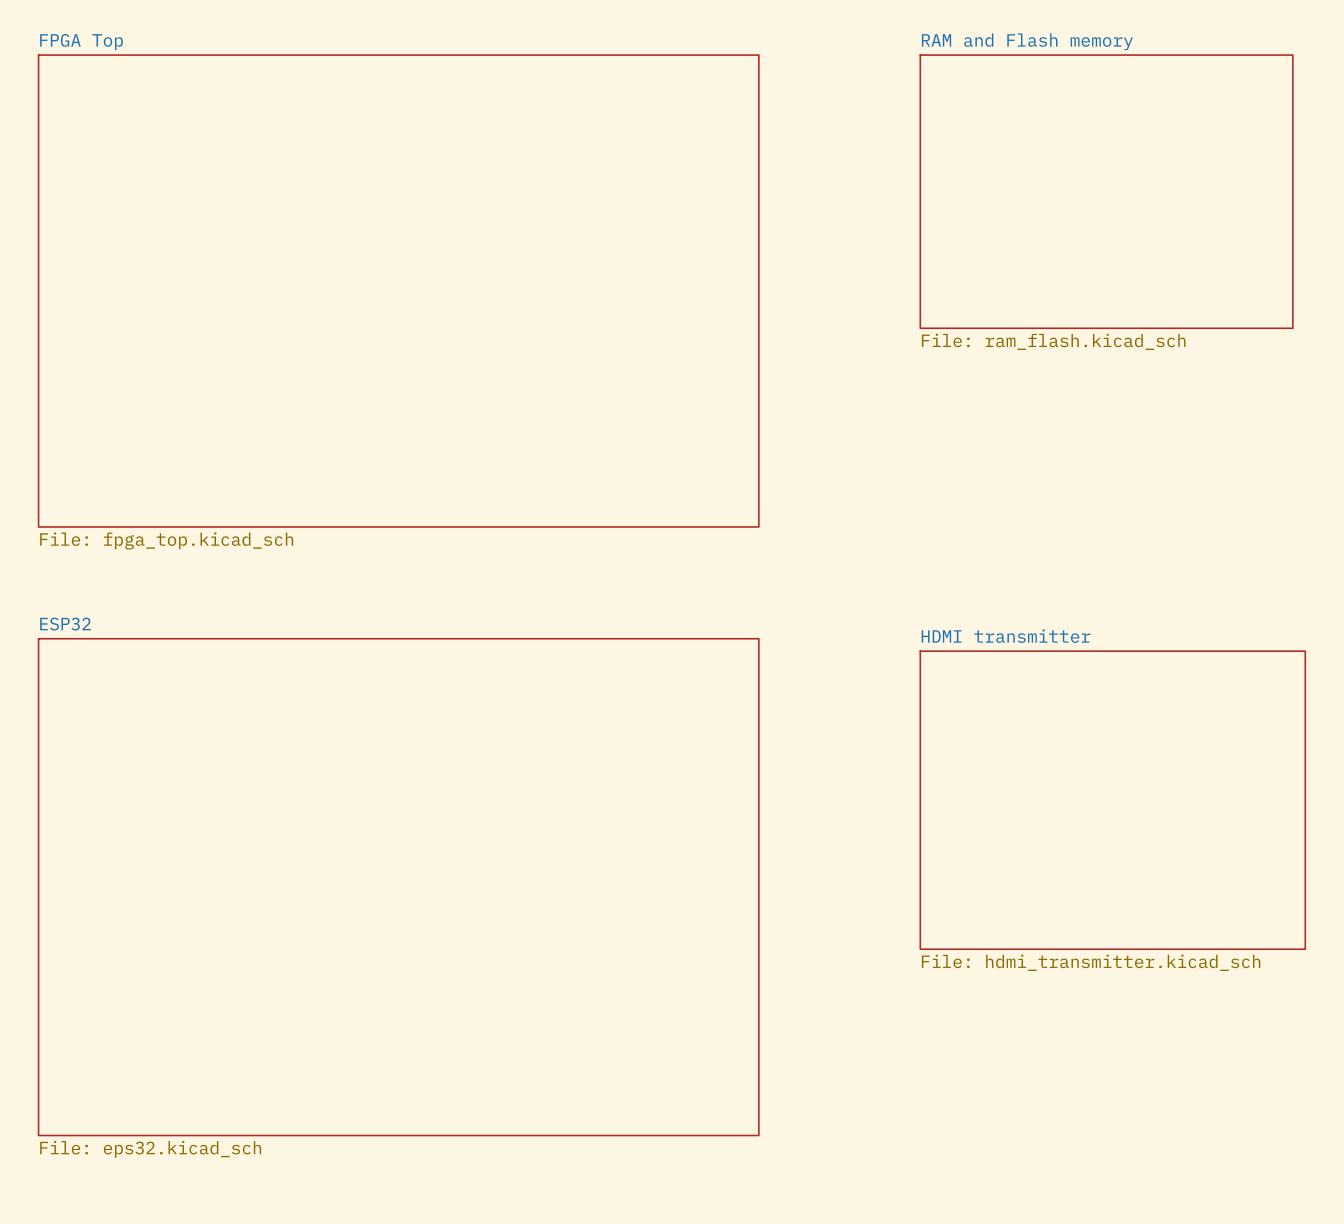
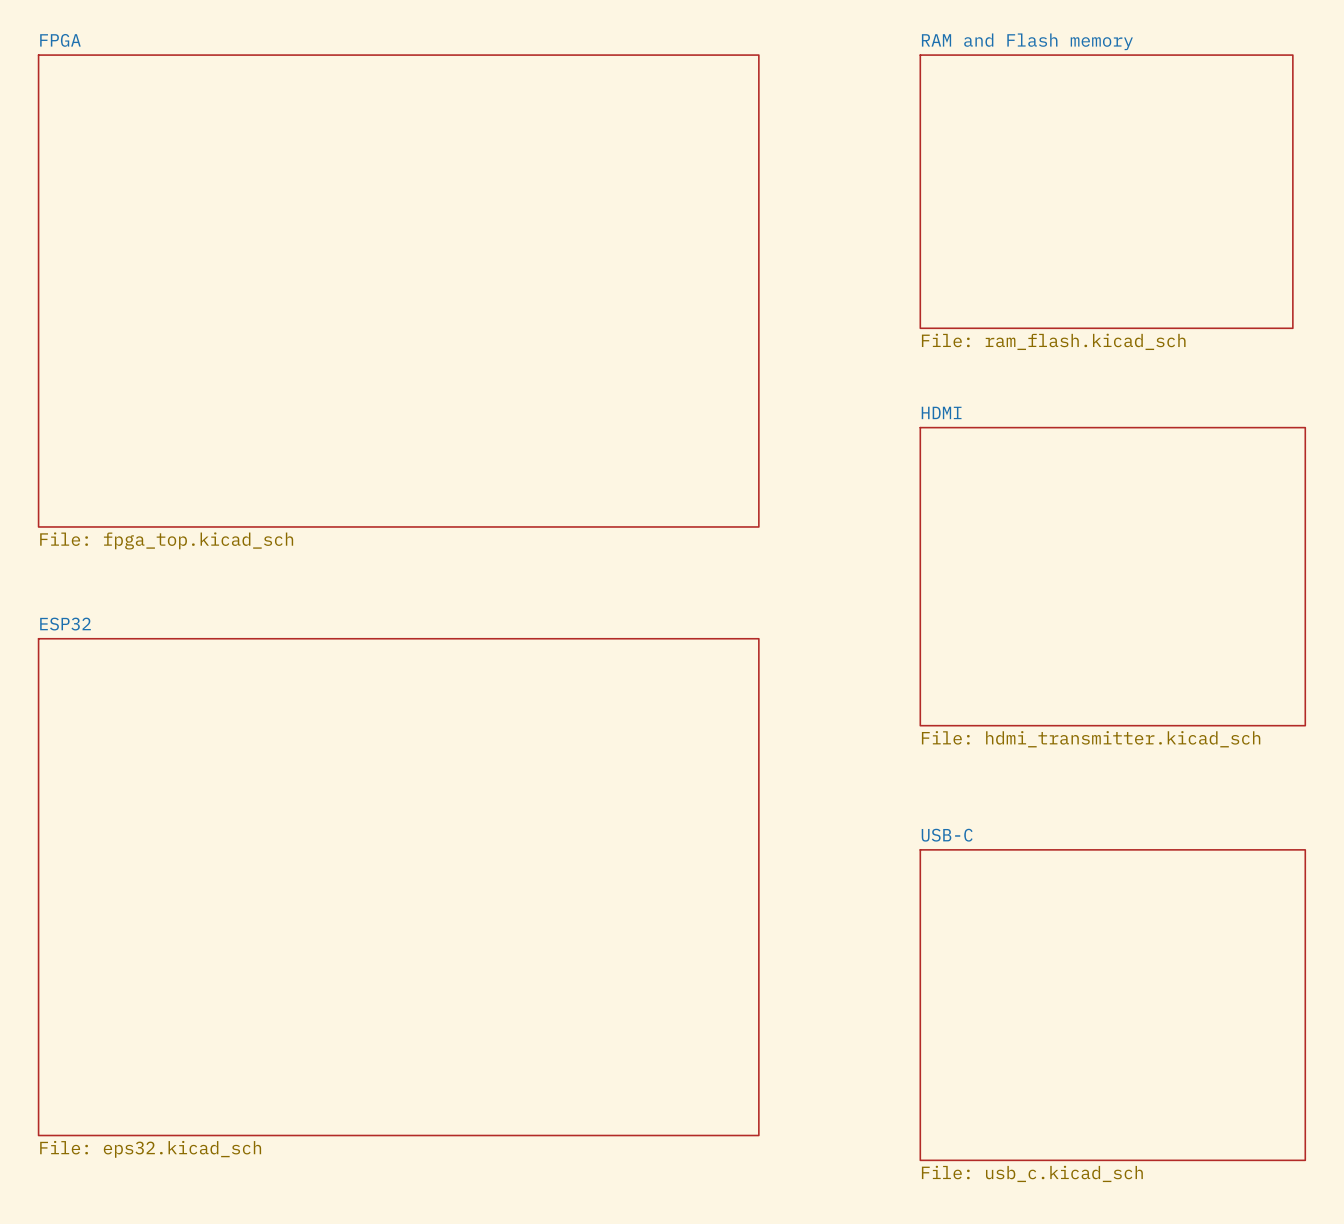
sheet FPGA Top name: FPGA Top (81, 42) -> FPGA (60, 40)
sheet HDMI: none -> File: hdmi_transmitter.kicad_sch (1112, 576)
sheet HDMI transmitter: File: hdmi_transmitter.kicad_sch (1112, 800) -> none
sheet USB-C: none -> File: usb_c.kicad_sch (1112, 1005)

